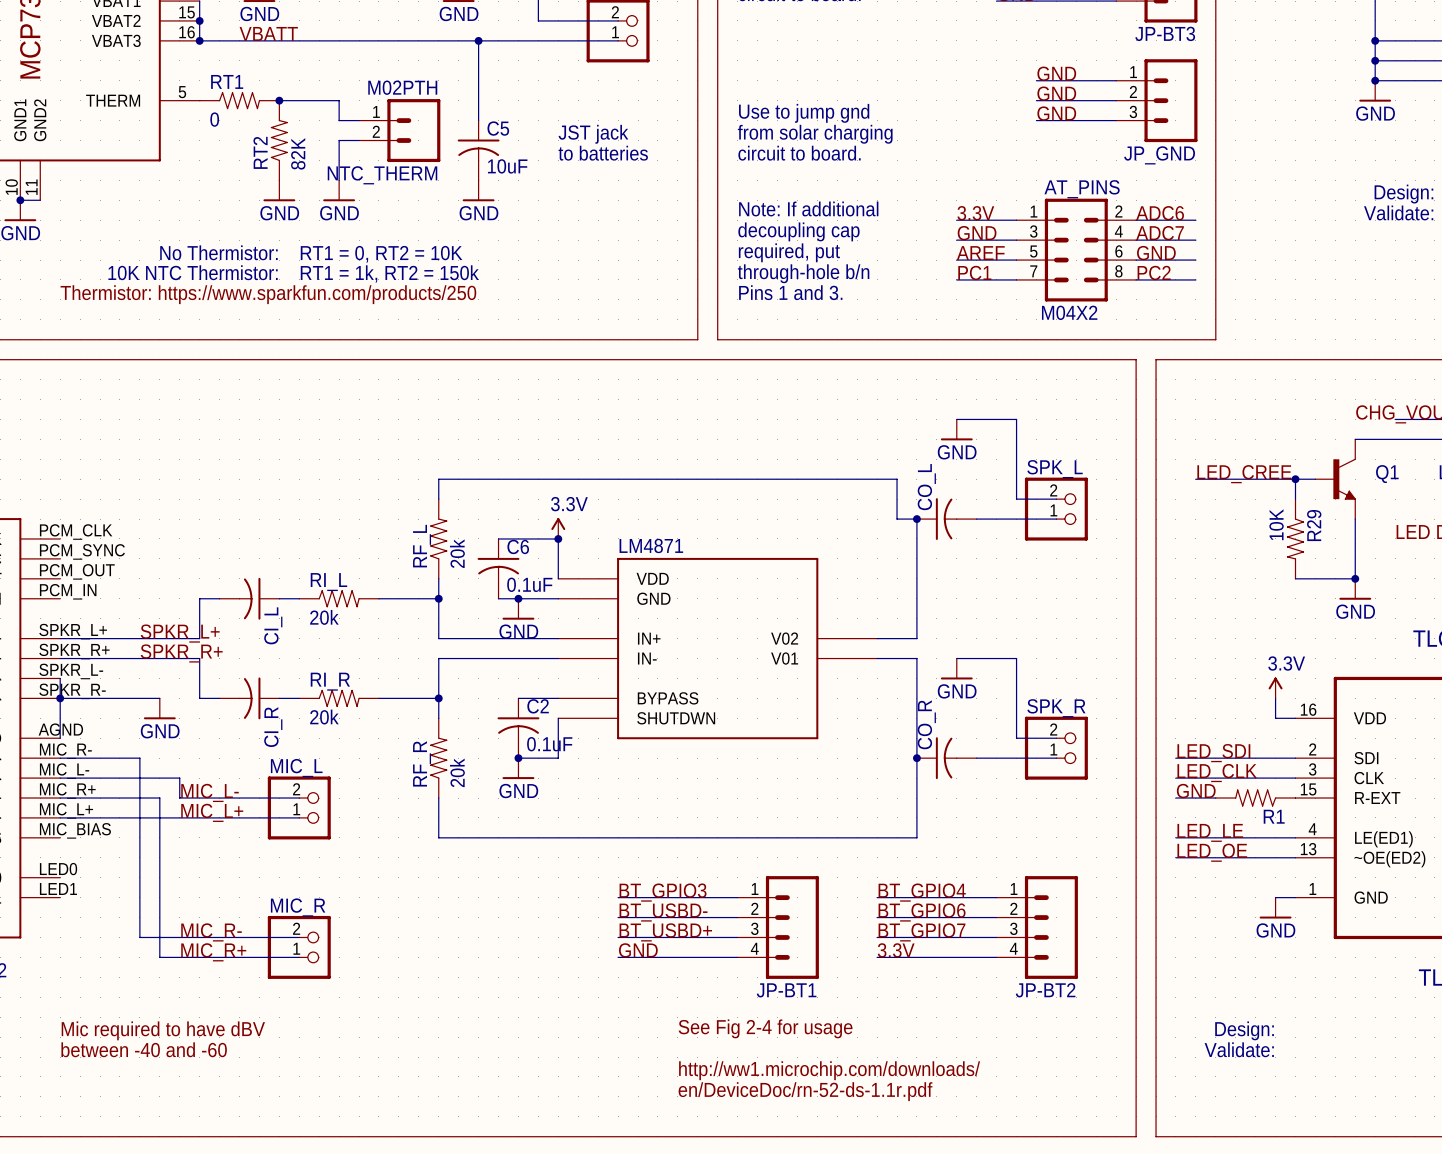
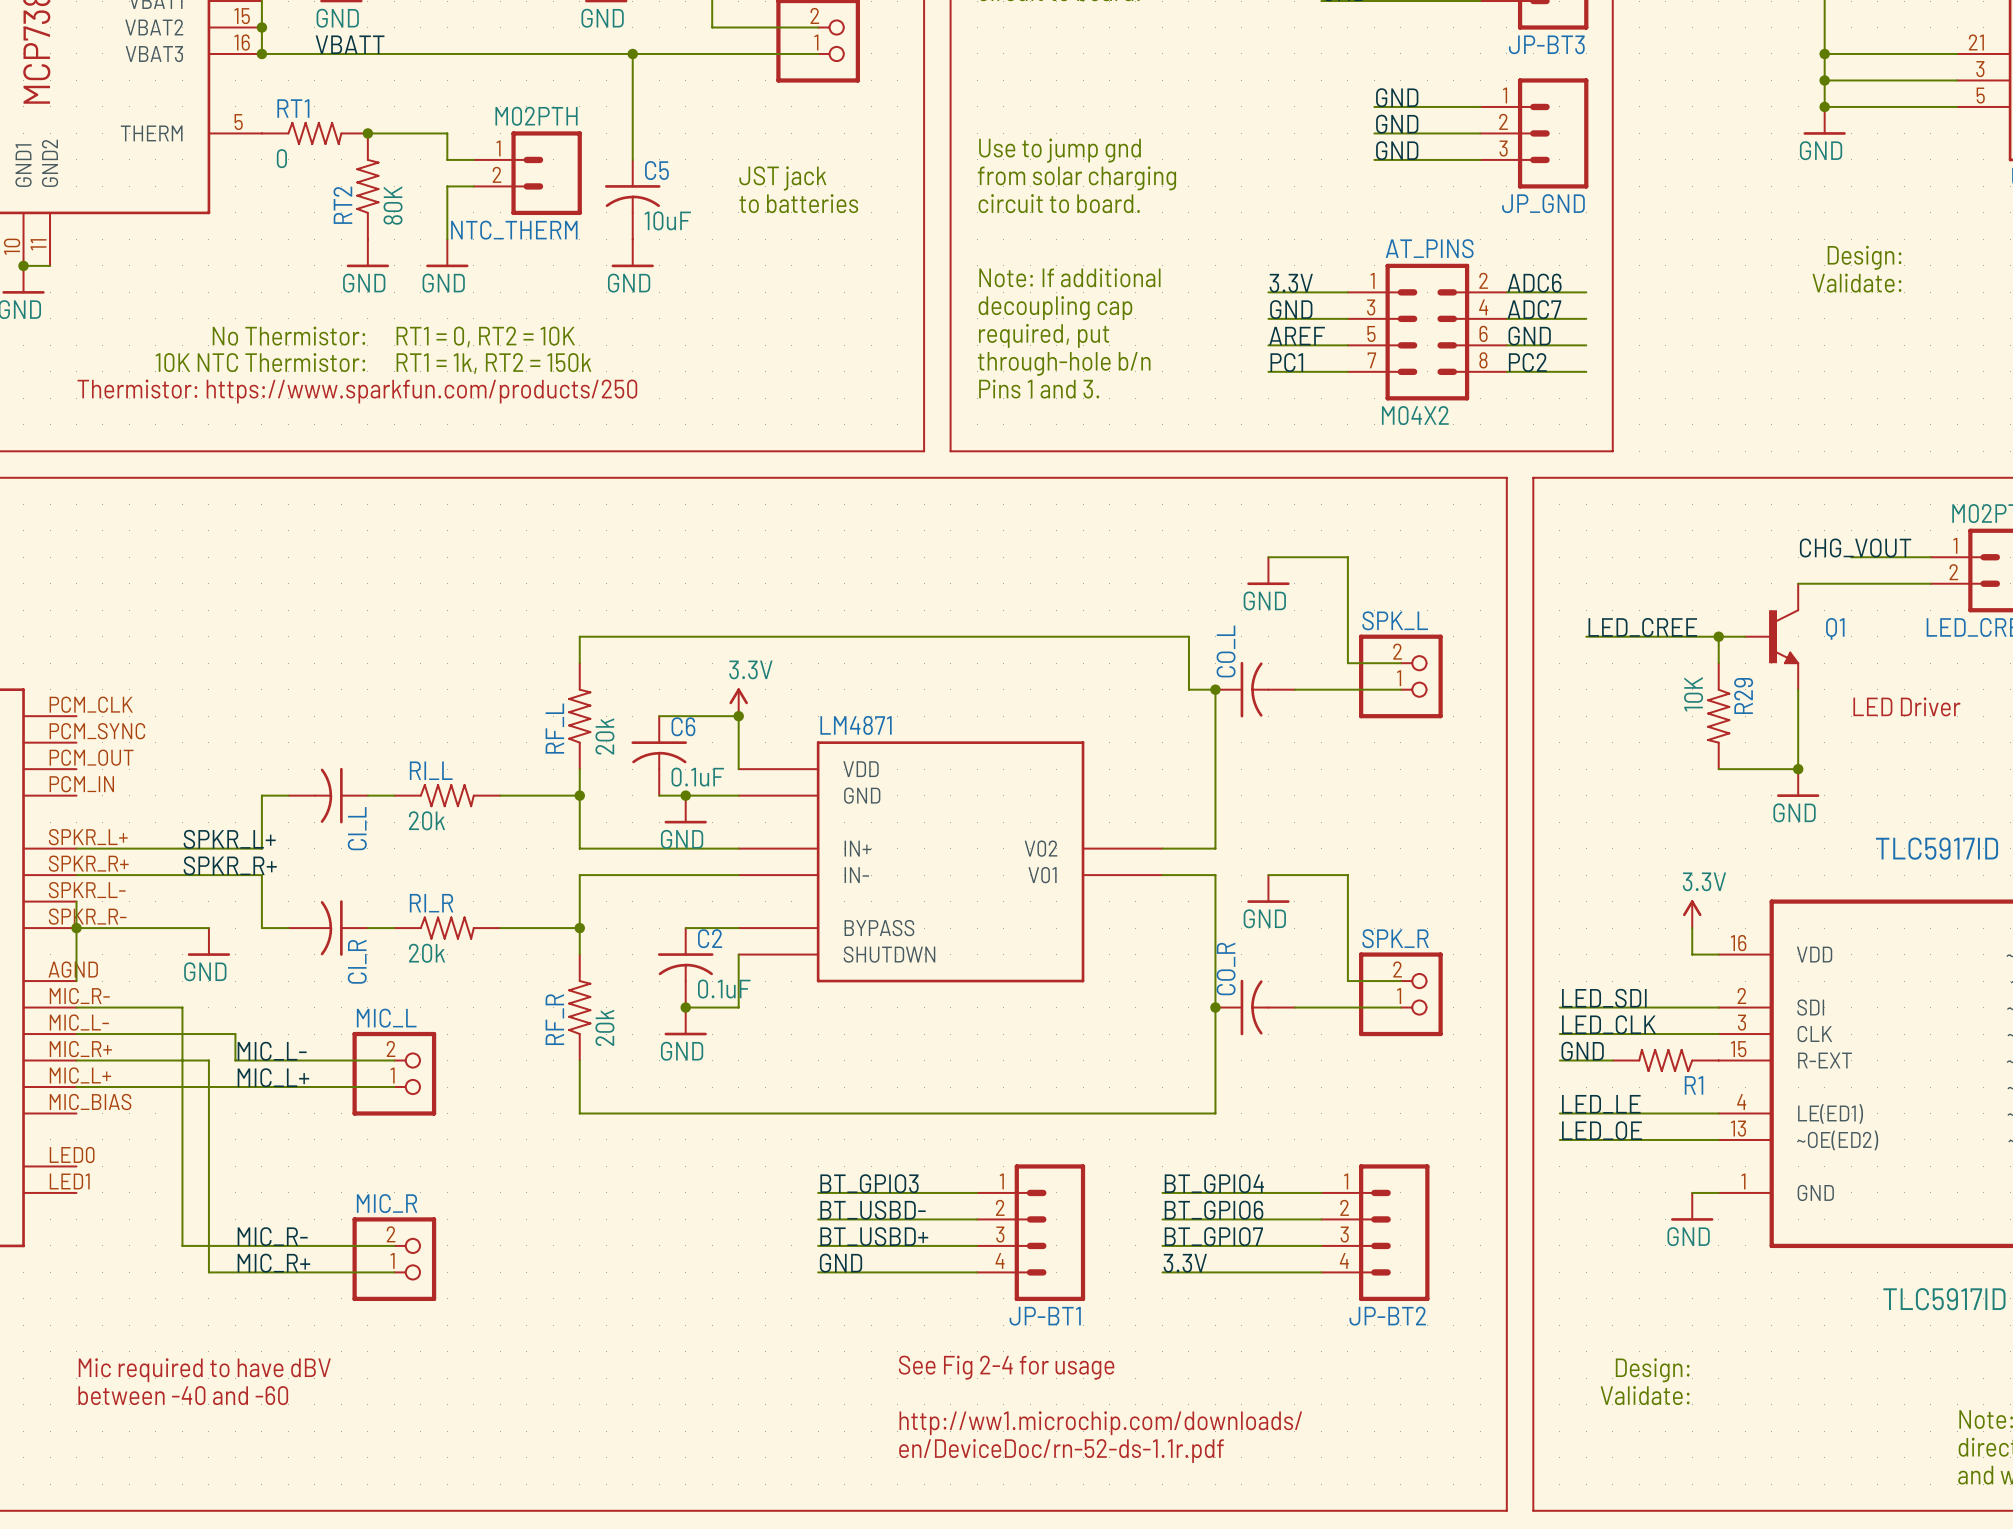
RT2 value: 82K (298, 153) -> 80K (393, 205)

